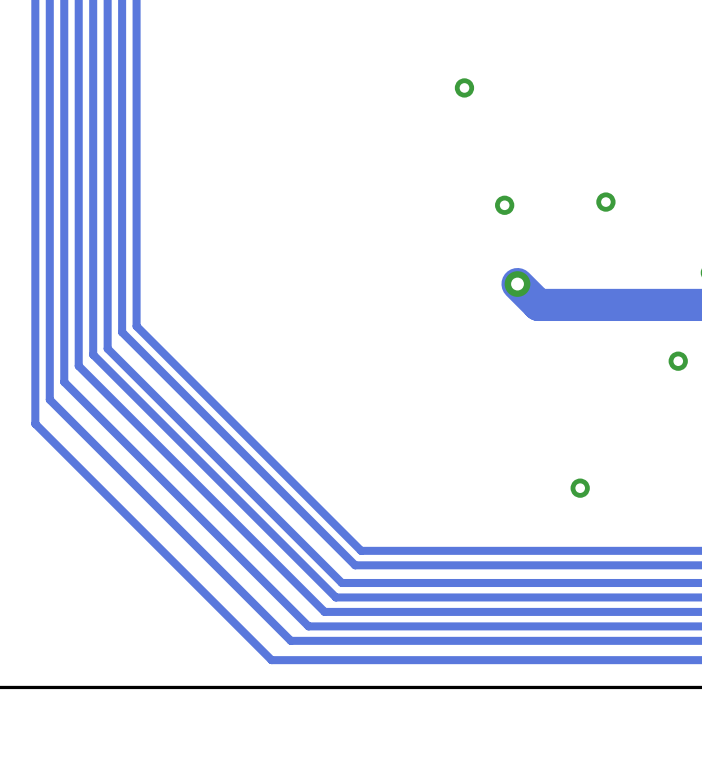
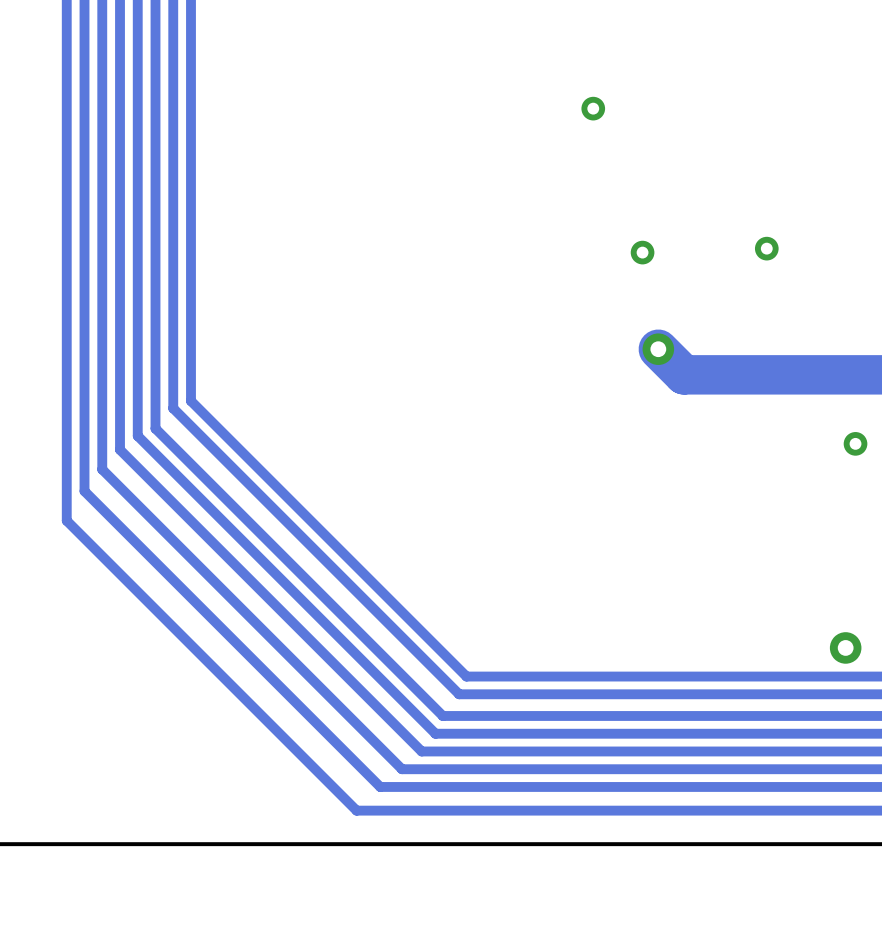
via: (580, 488) -> none
via: none -> (845, 647)

